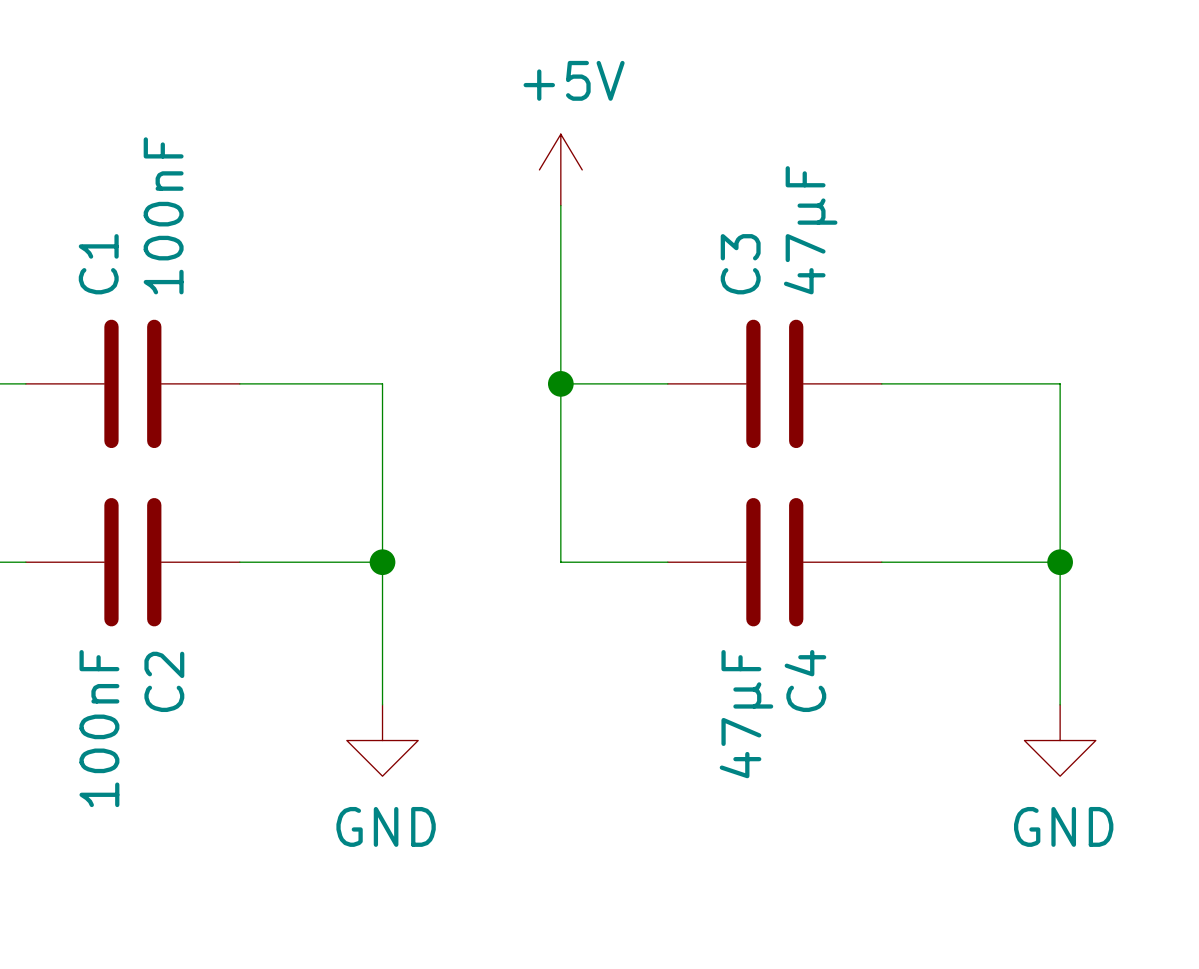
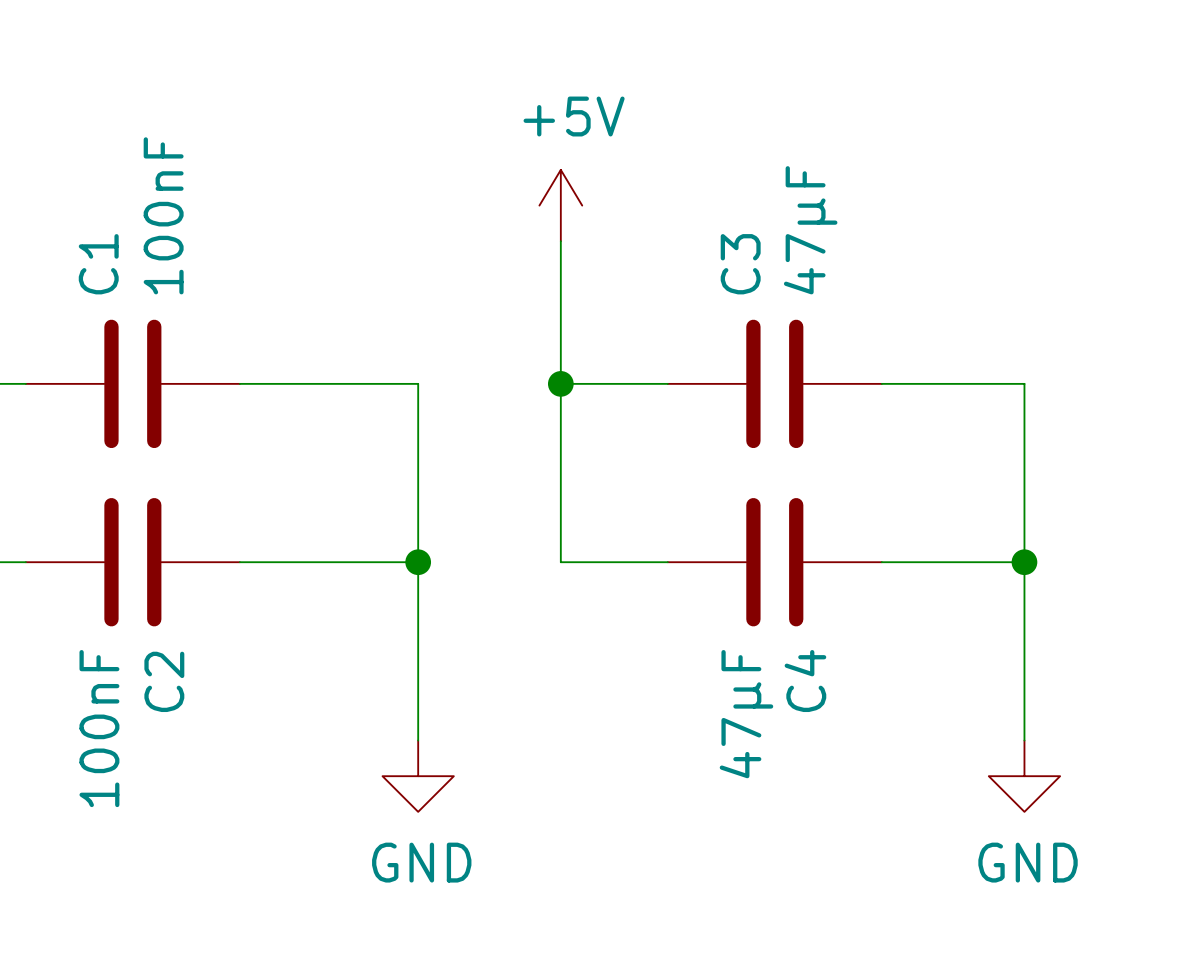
power symbol position: +5V (560, 169) -> +5V (560, 205)
wire: (382, 383) (382, 704) -> (382, 383) (418, 383) (418, 740)
wire: (1024, 383) (1060, 383) (1060, 704) -> (1024, 383) (1024, 740)
junction position: (382, 562) -> (418, 562)
wire: (1024, 562) (1060, 562) -> (382, 562) (418, 562)
junction position: (1060, 562) -> (1024, 562)
power symbol position: GND (382, 740) -> GND (418, 776)
power symbol position: GND (1060, 740) -> GND (1024, 776)

